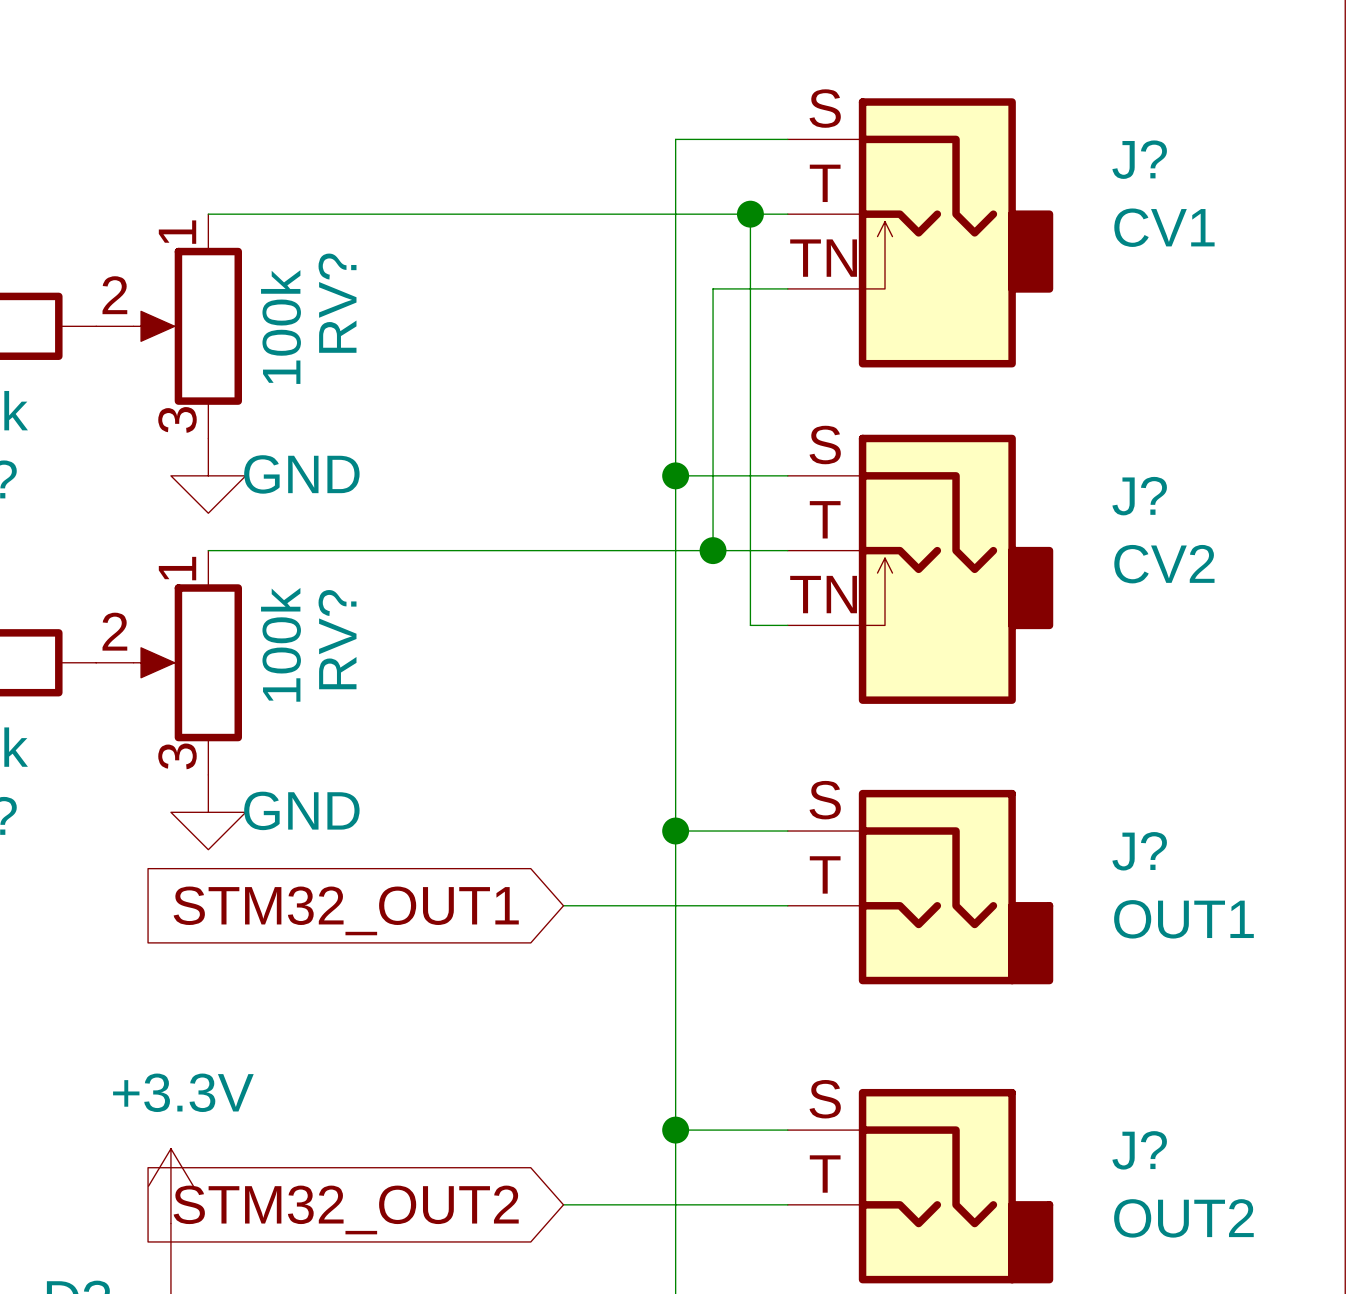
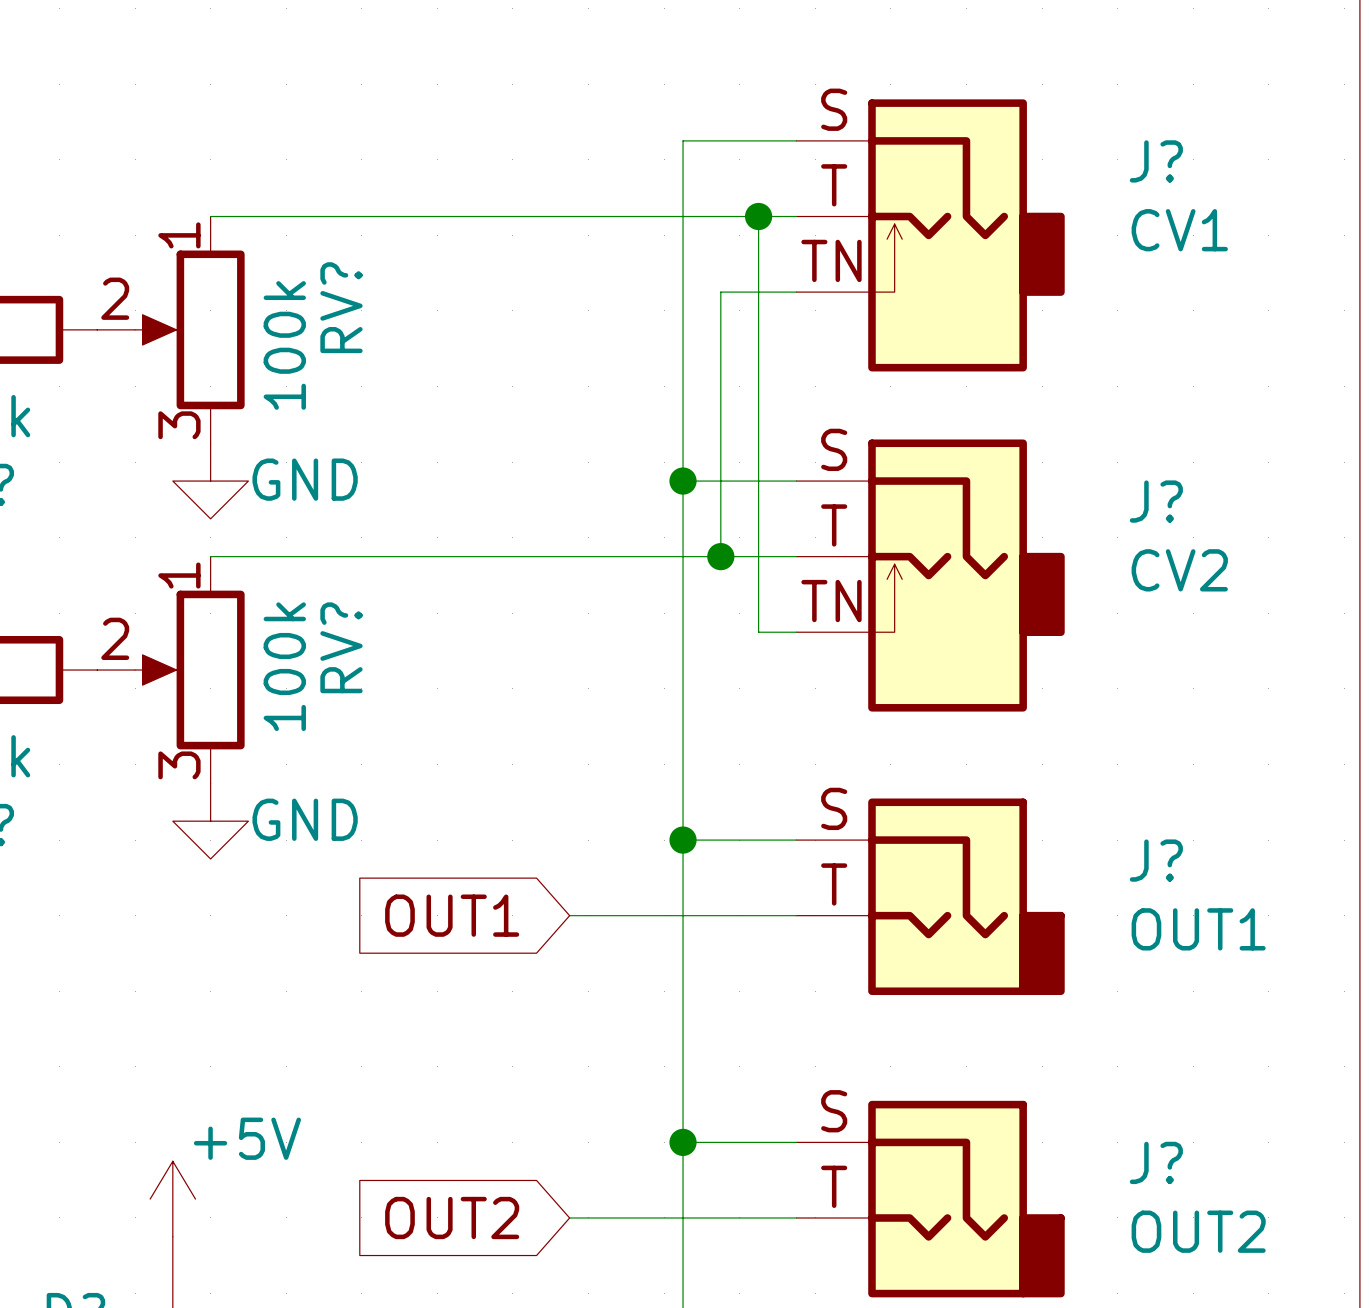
global label: STM32_OUT1 (346, 910) -> OUT1 (452, 915)
power symbol: +3.3V (170, 1186) -> +5V (172, 1199)
global label: STM32_OUT2 (346, 1209) -> OUT2 (452, 1217)

